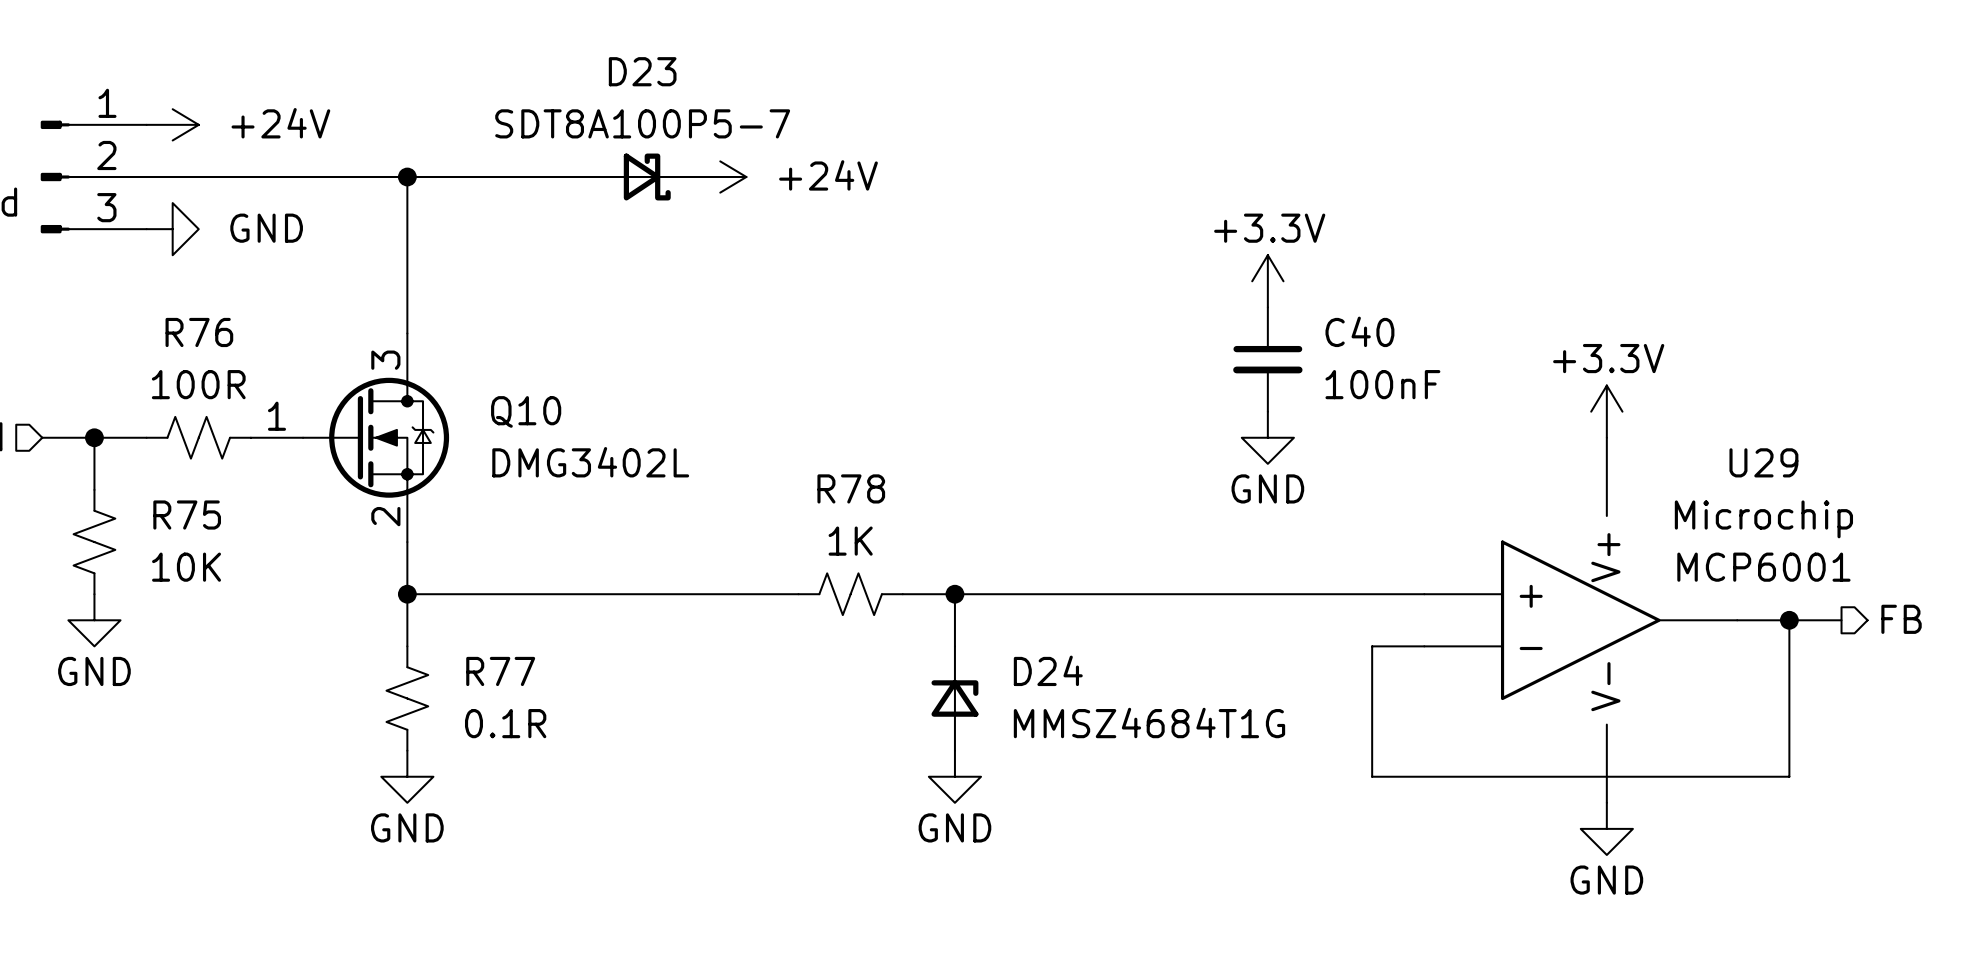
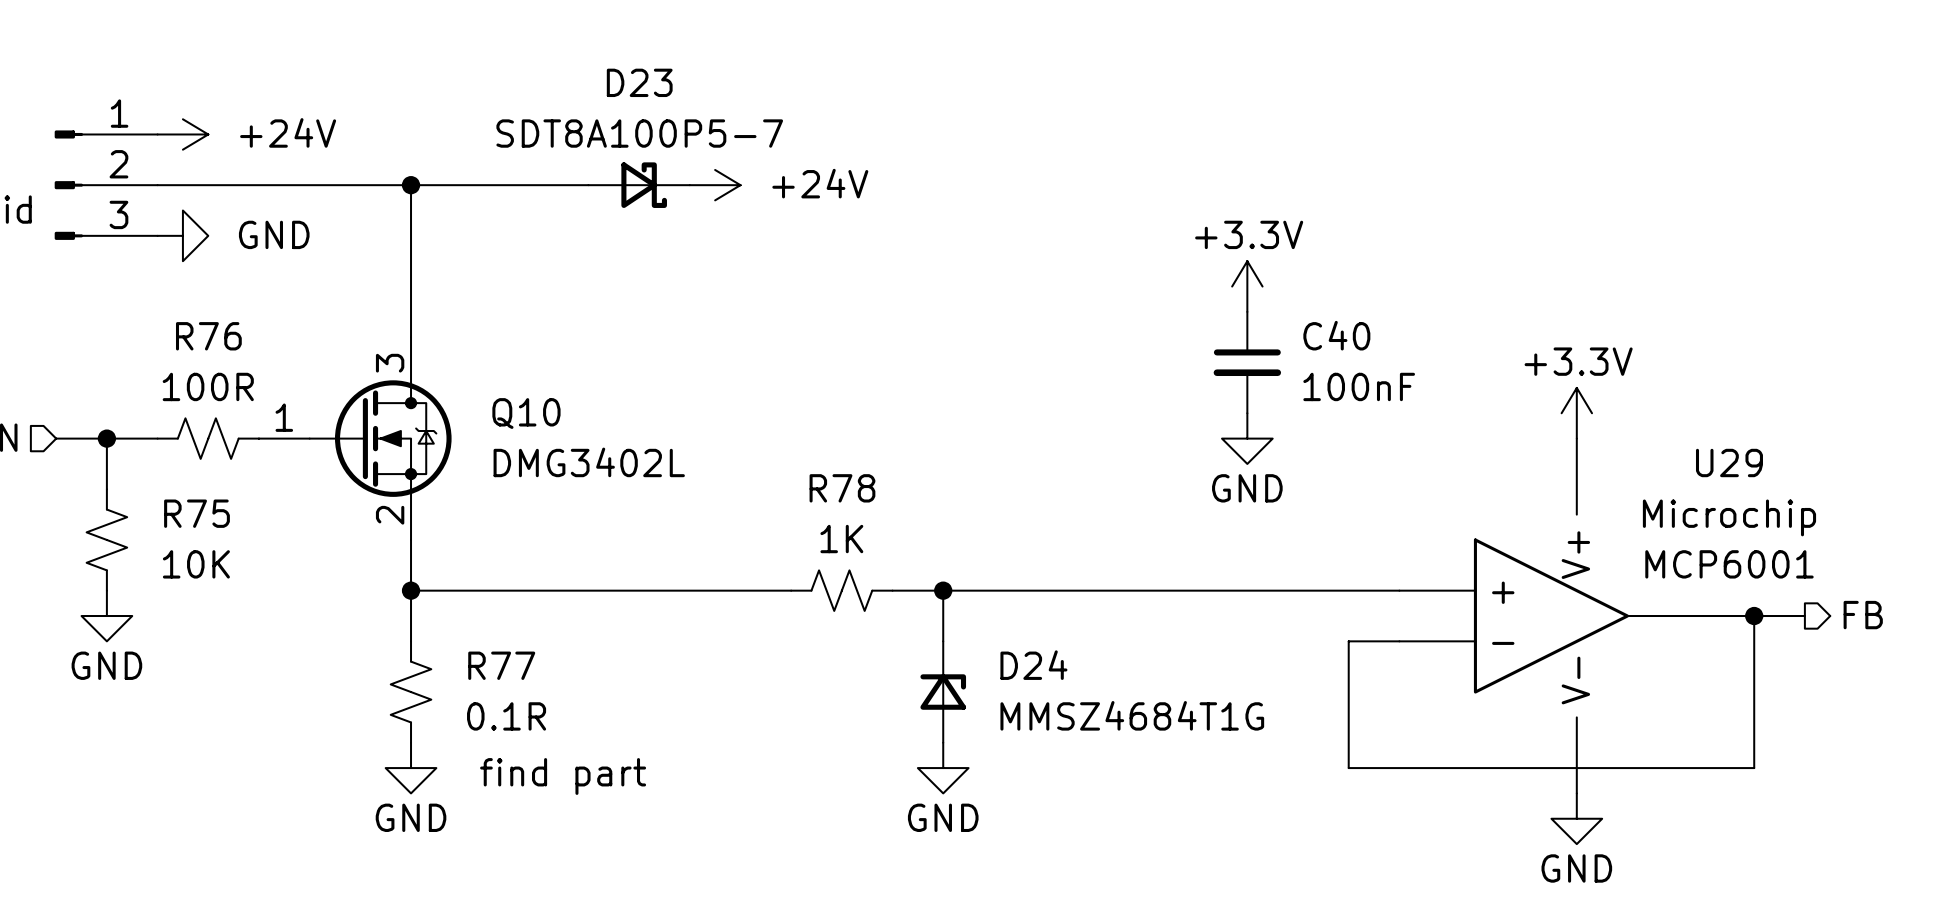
text: none -> find part (563, 776)

